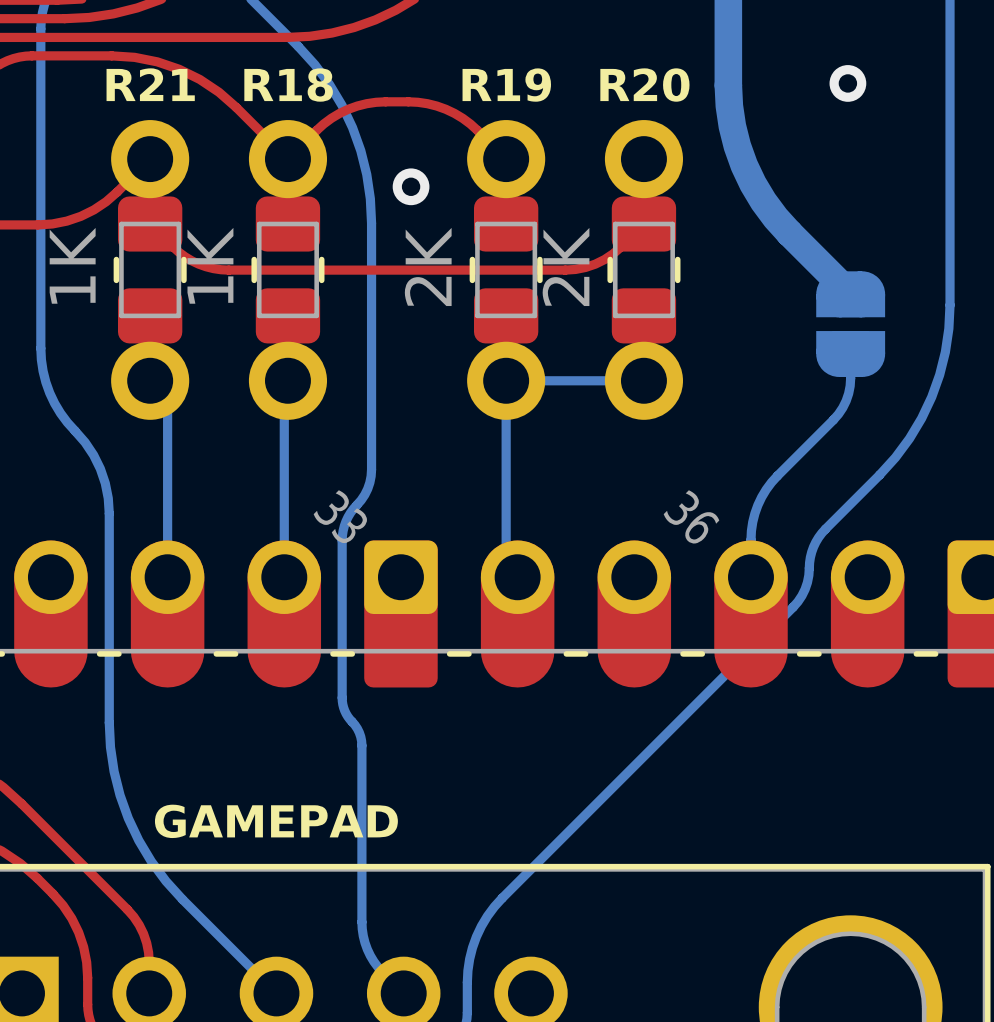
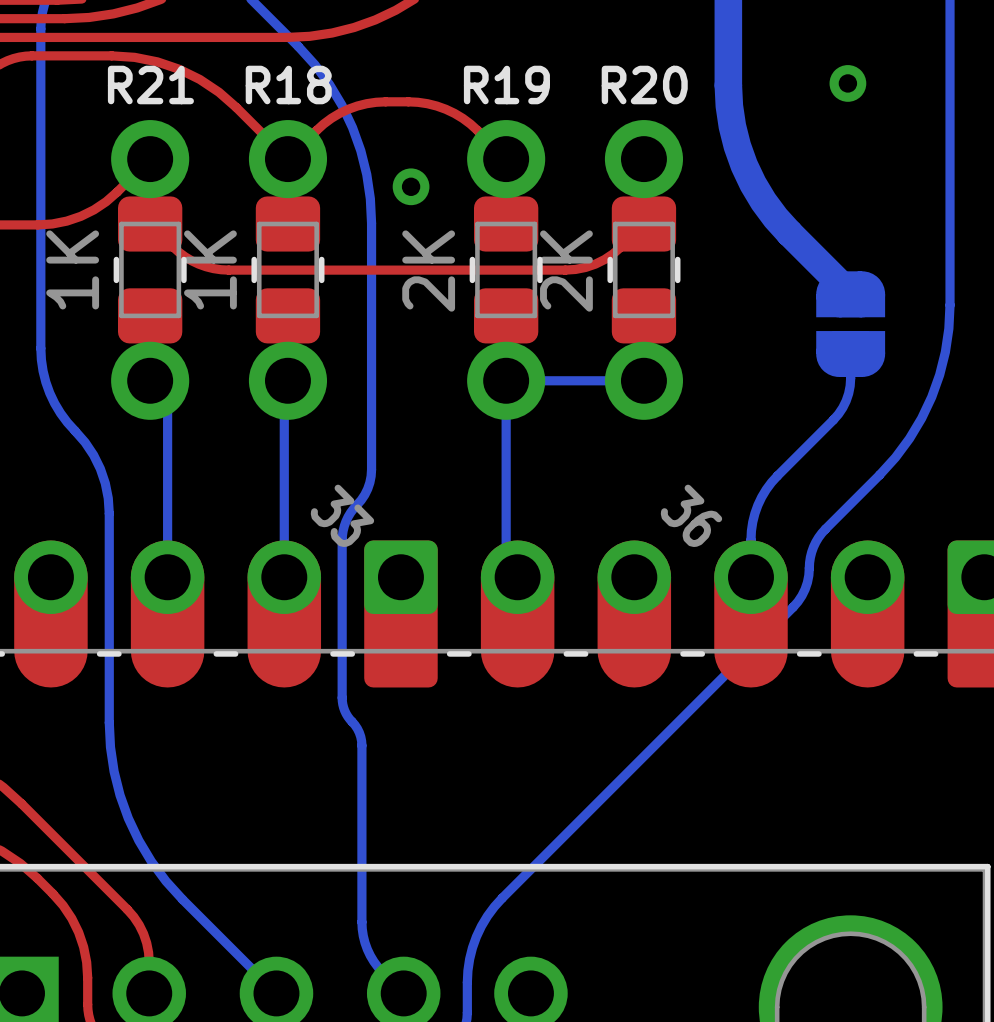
text: GAMEPAD (276, 821) -> none

